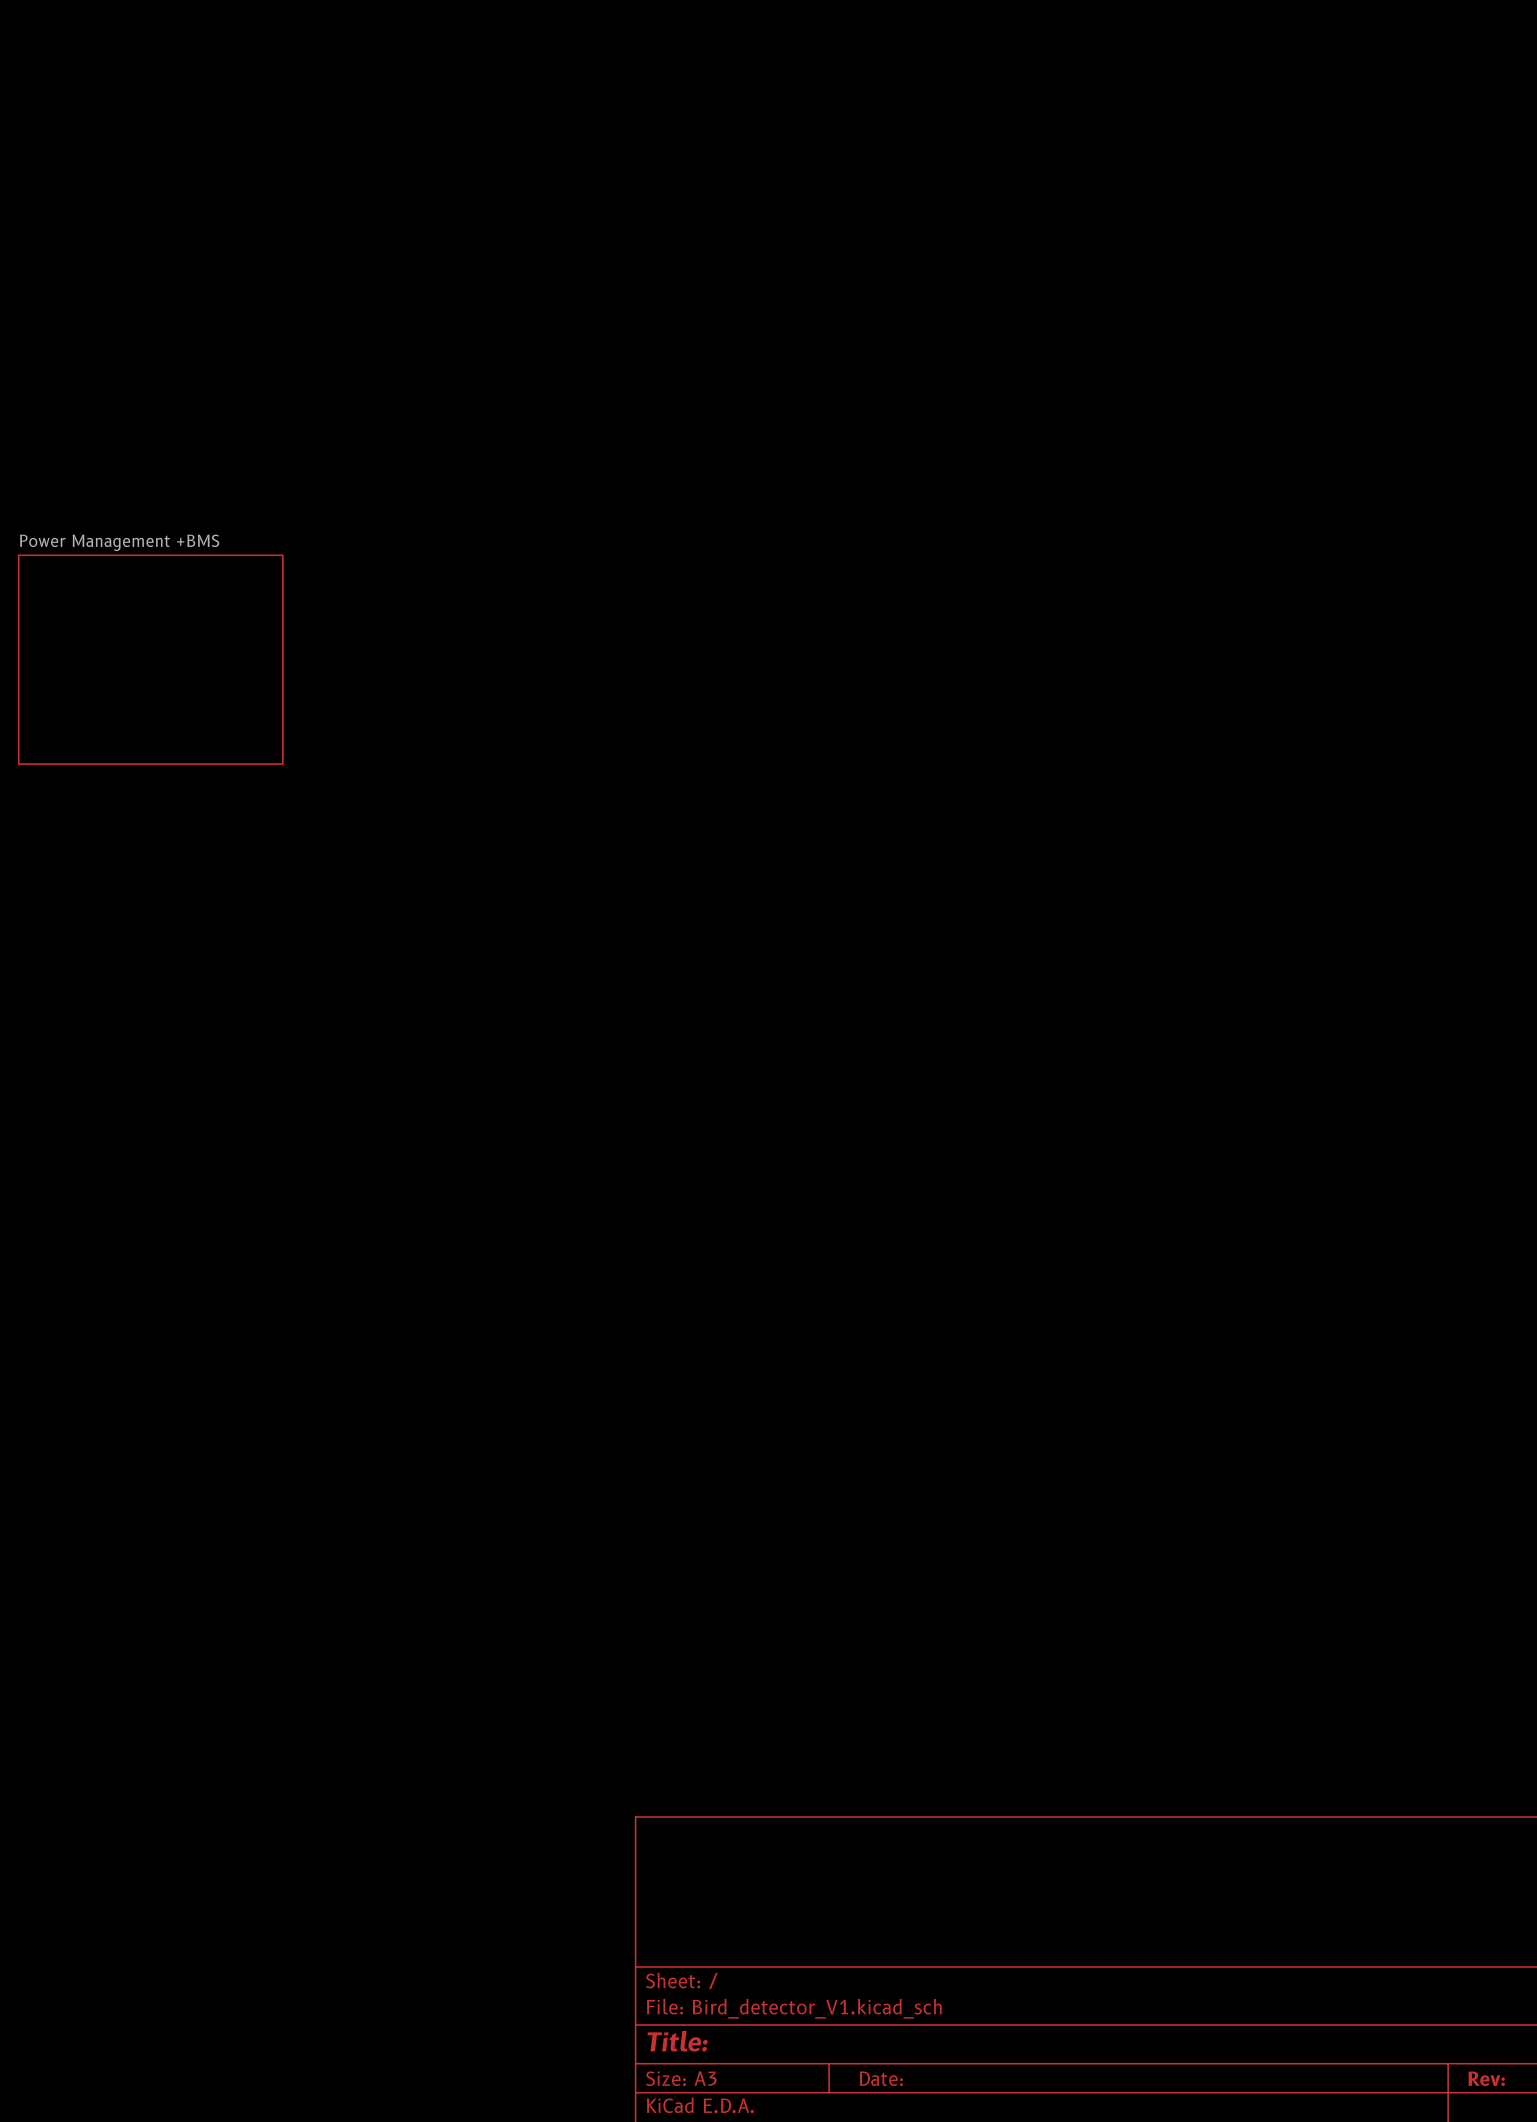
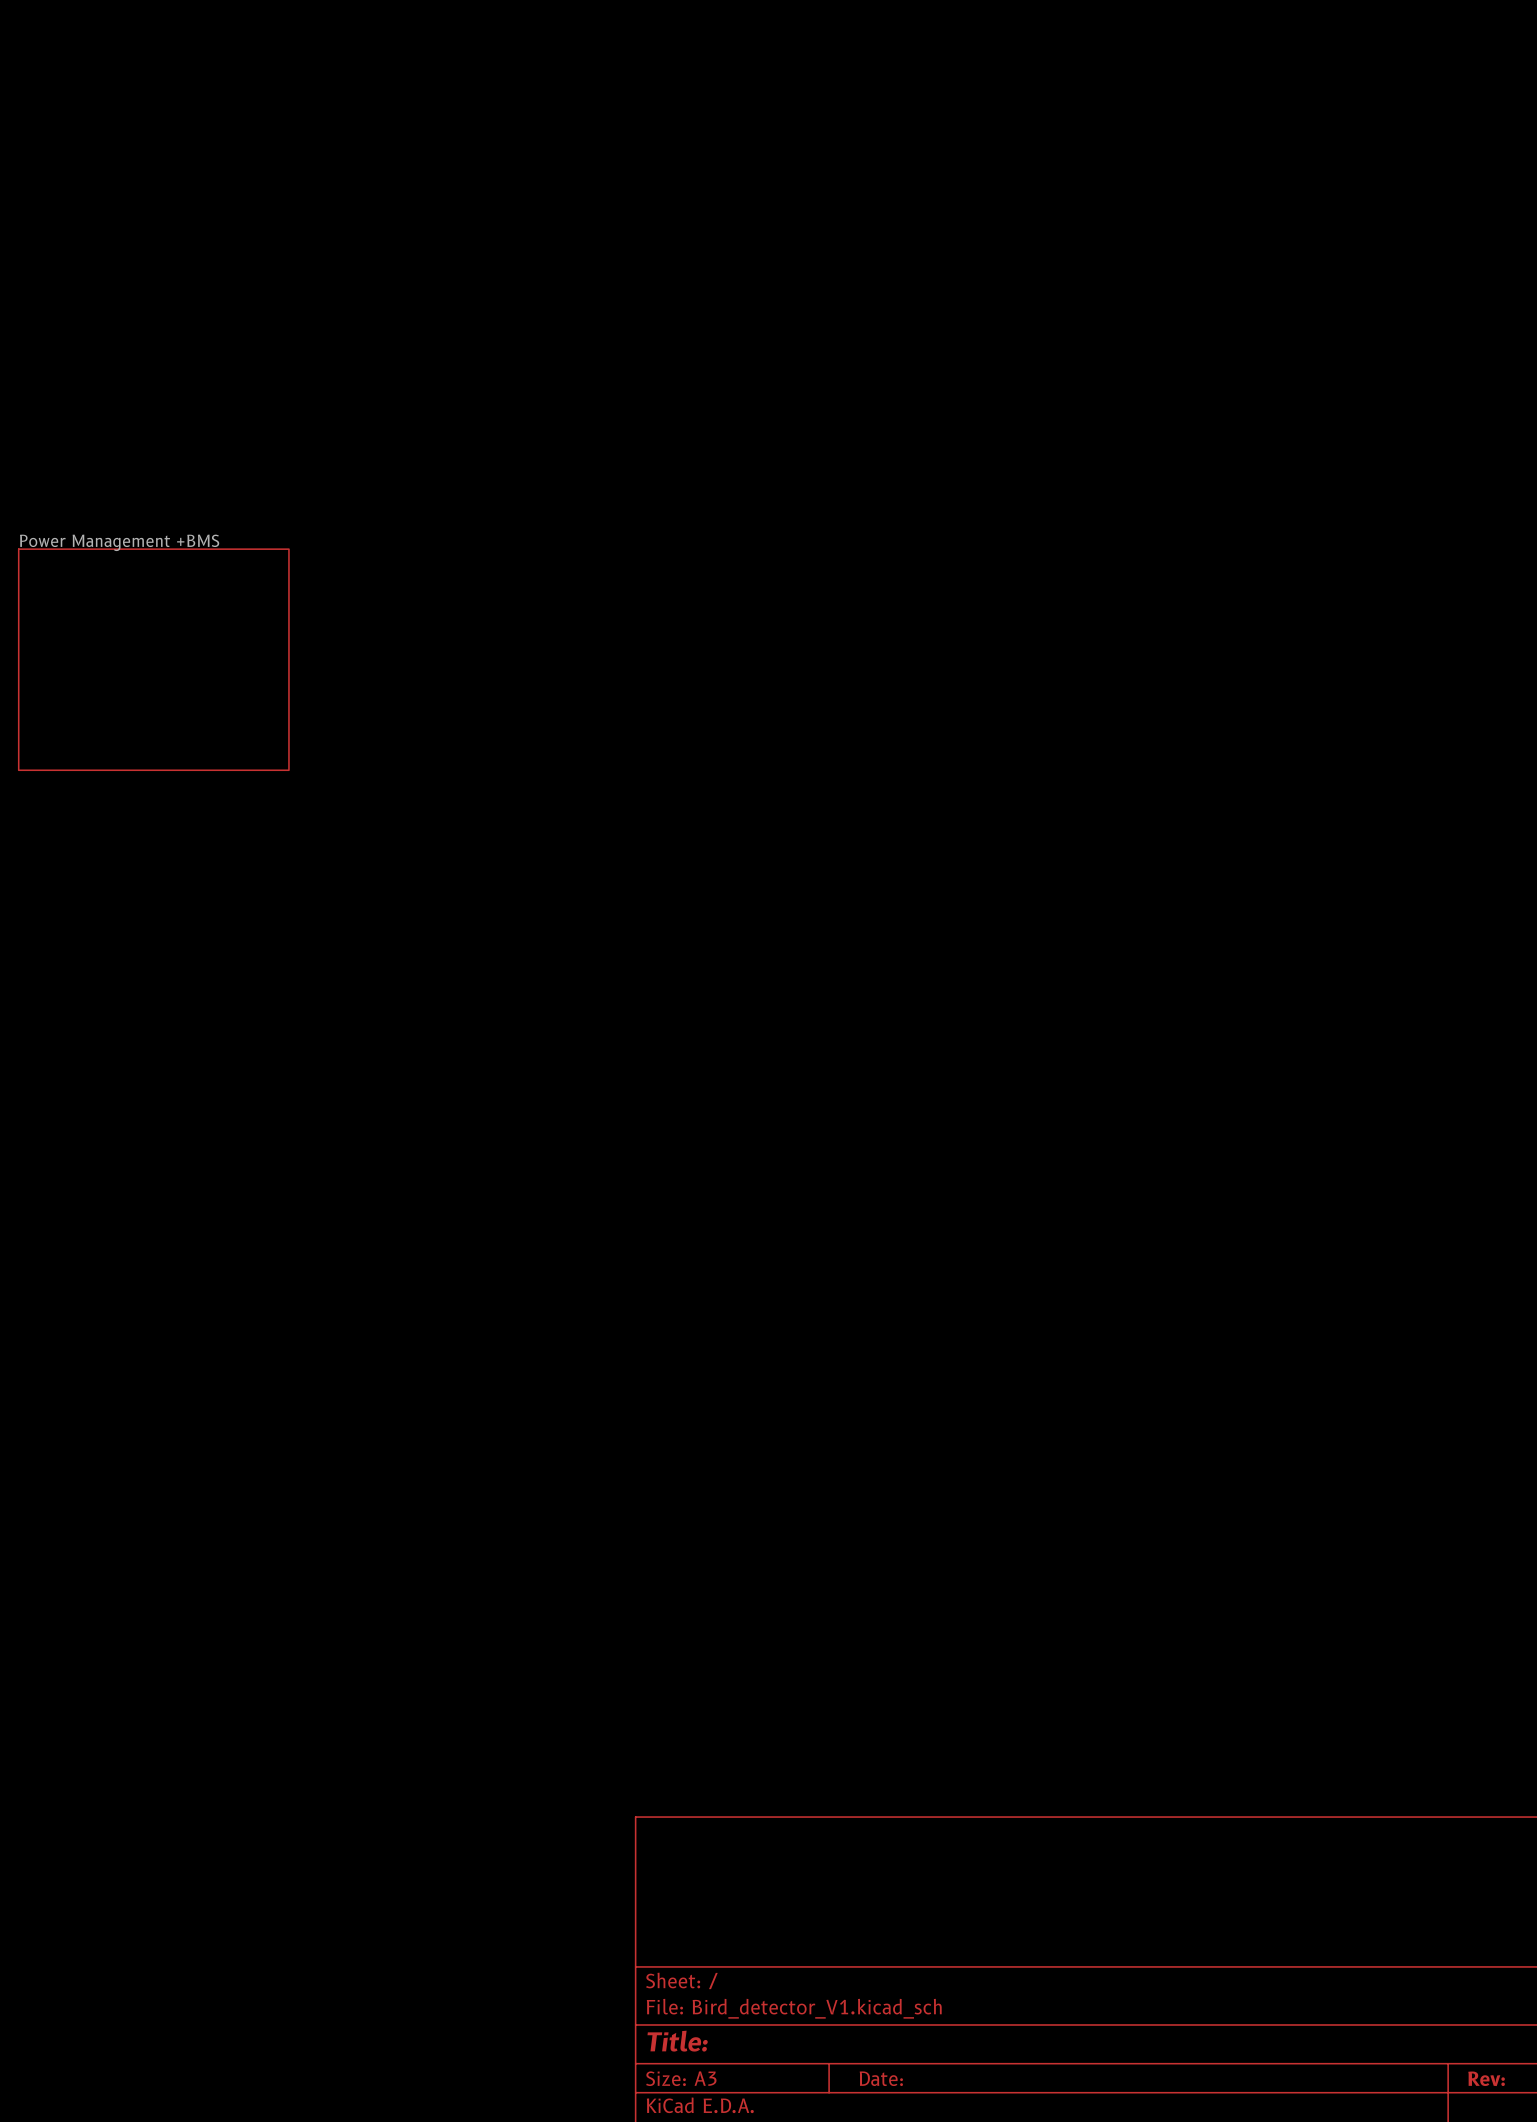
sheet Power Management +BMS shape: [17, 554, 284, 765] -> [17, 548, 290, 772]

